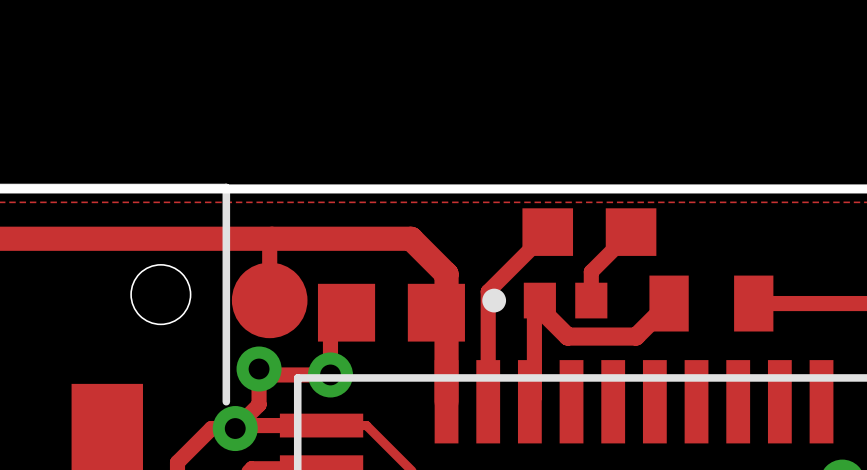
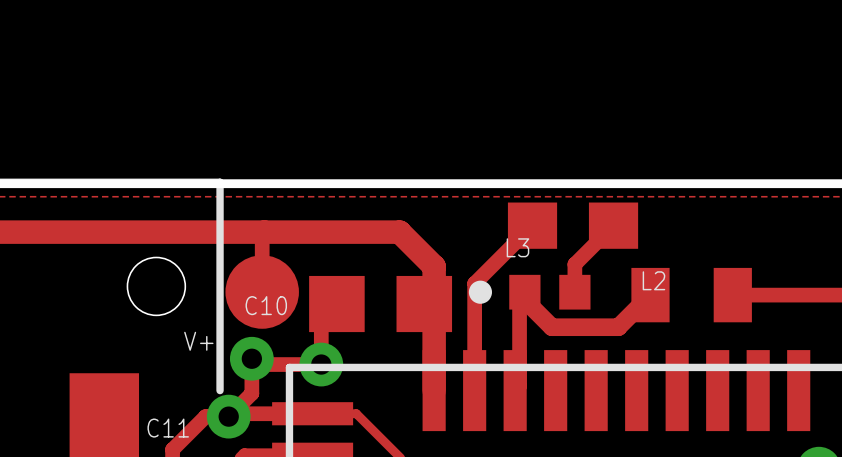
L3 name: none -> L3 (517, 247)
L2 name: none -> L2 (653, 280)
C10 name: none -> C10 (266, 305)
text: none -> V+ (198, 341)
C11 name: none -> C11 (168, 428)

